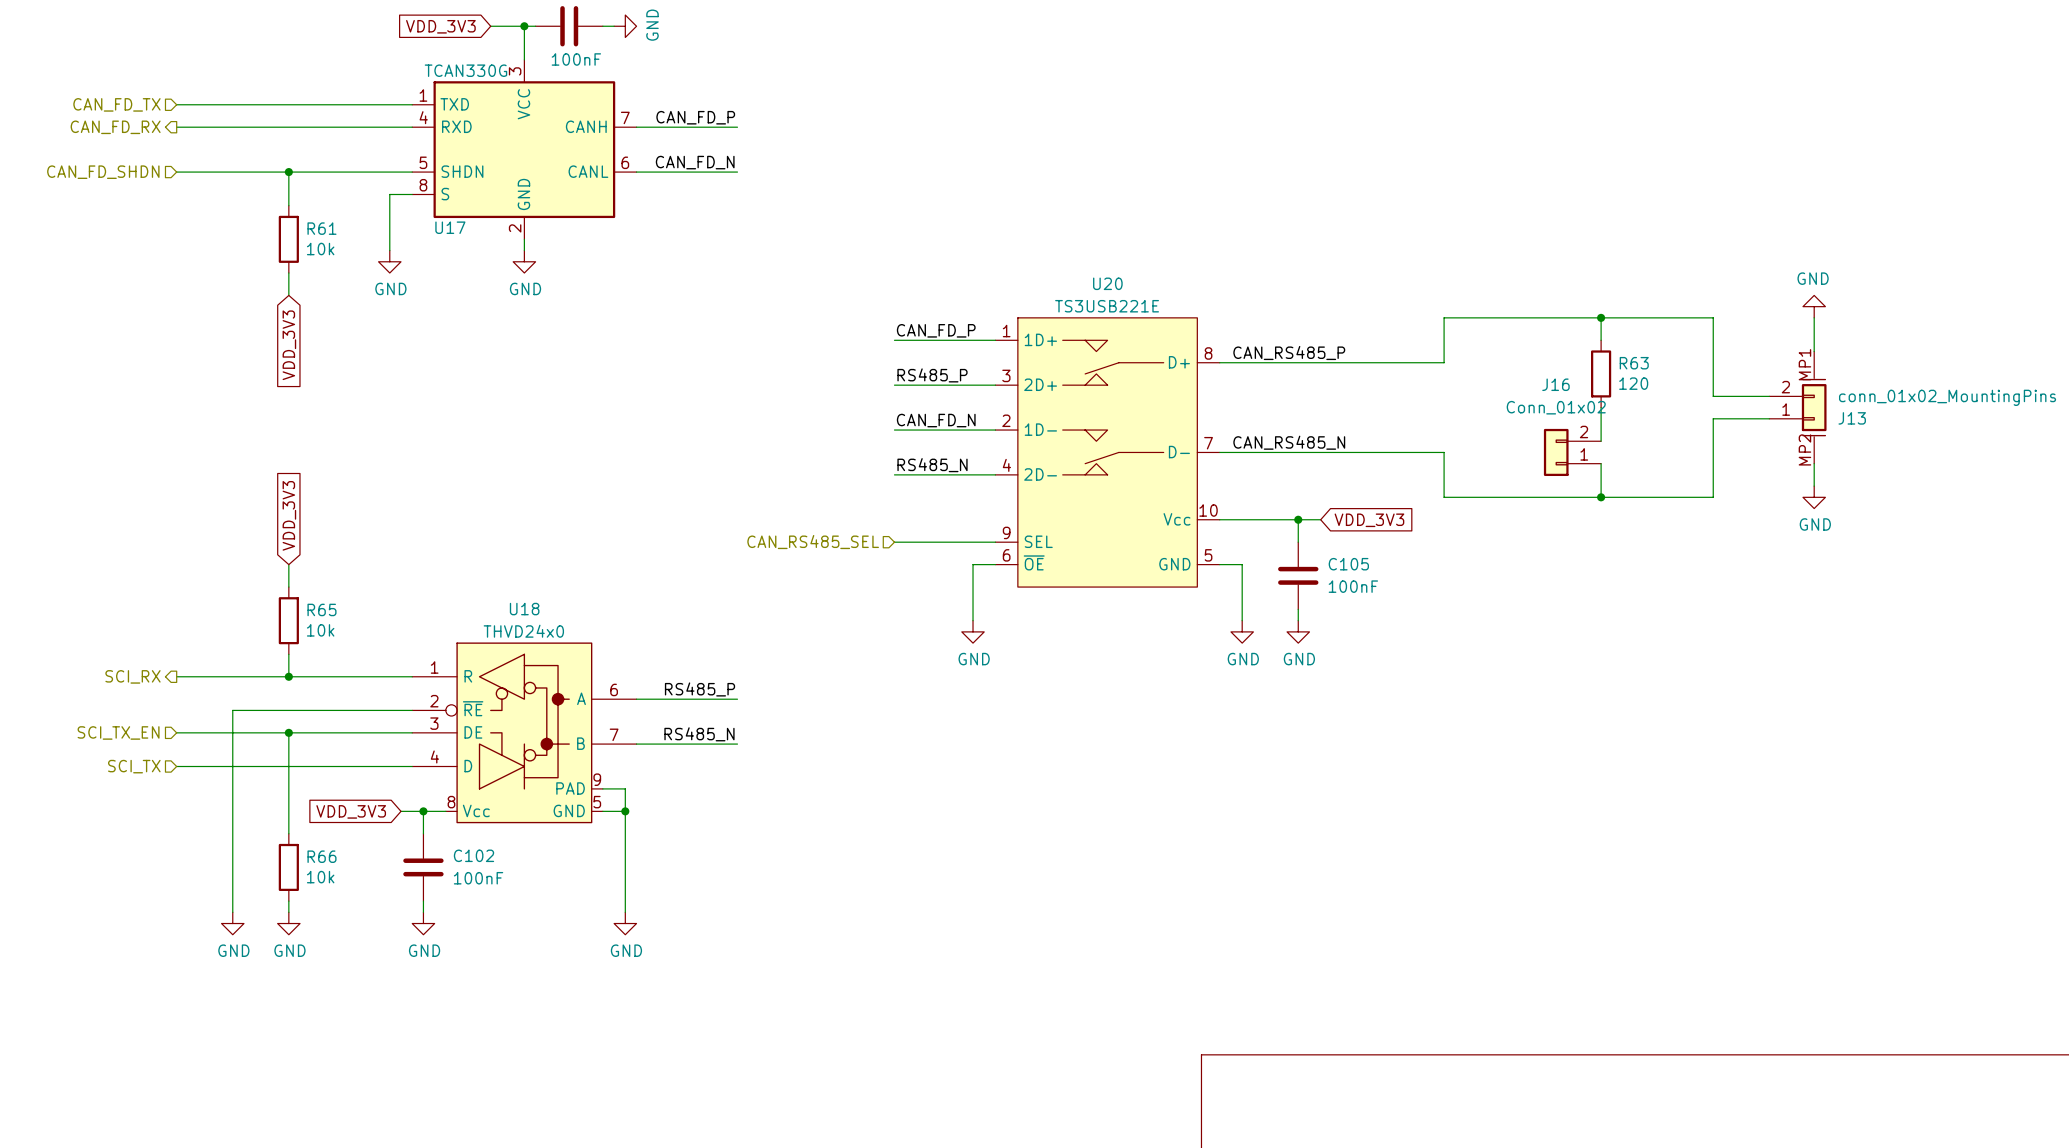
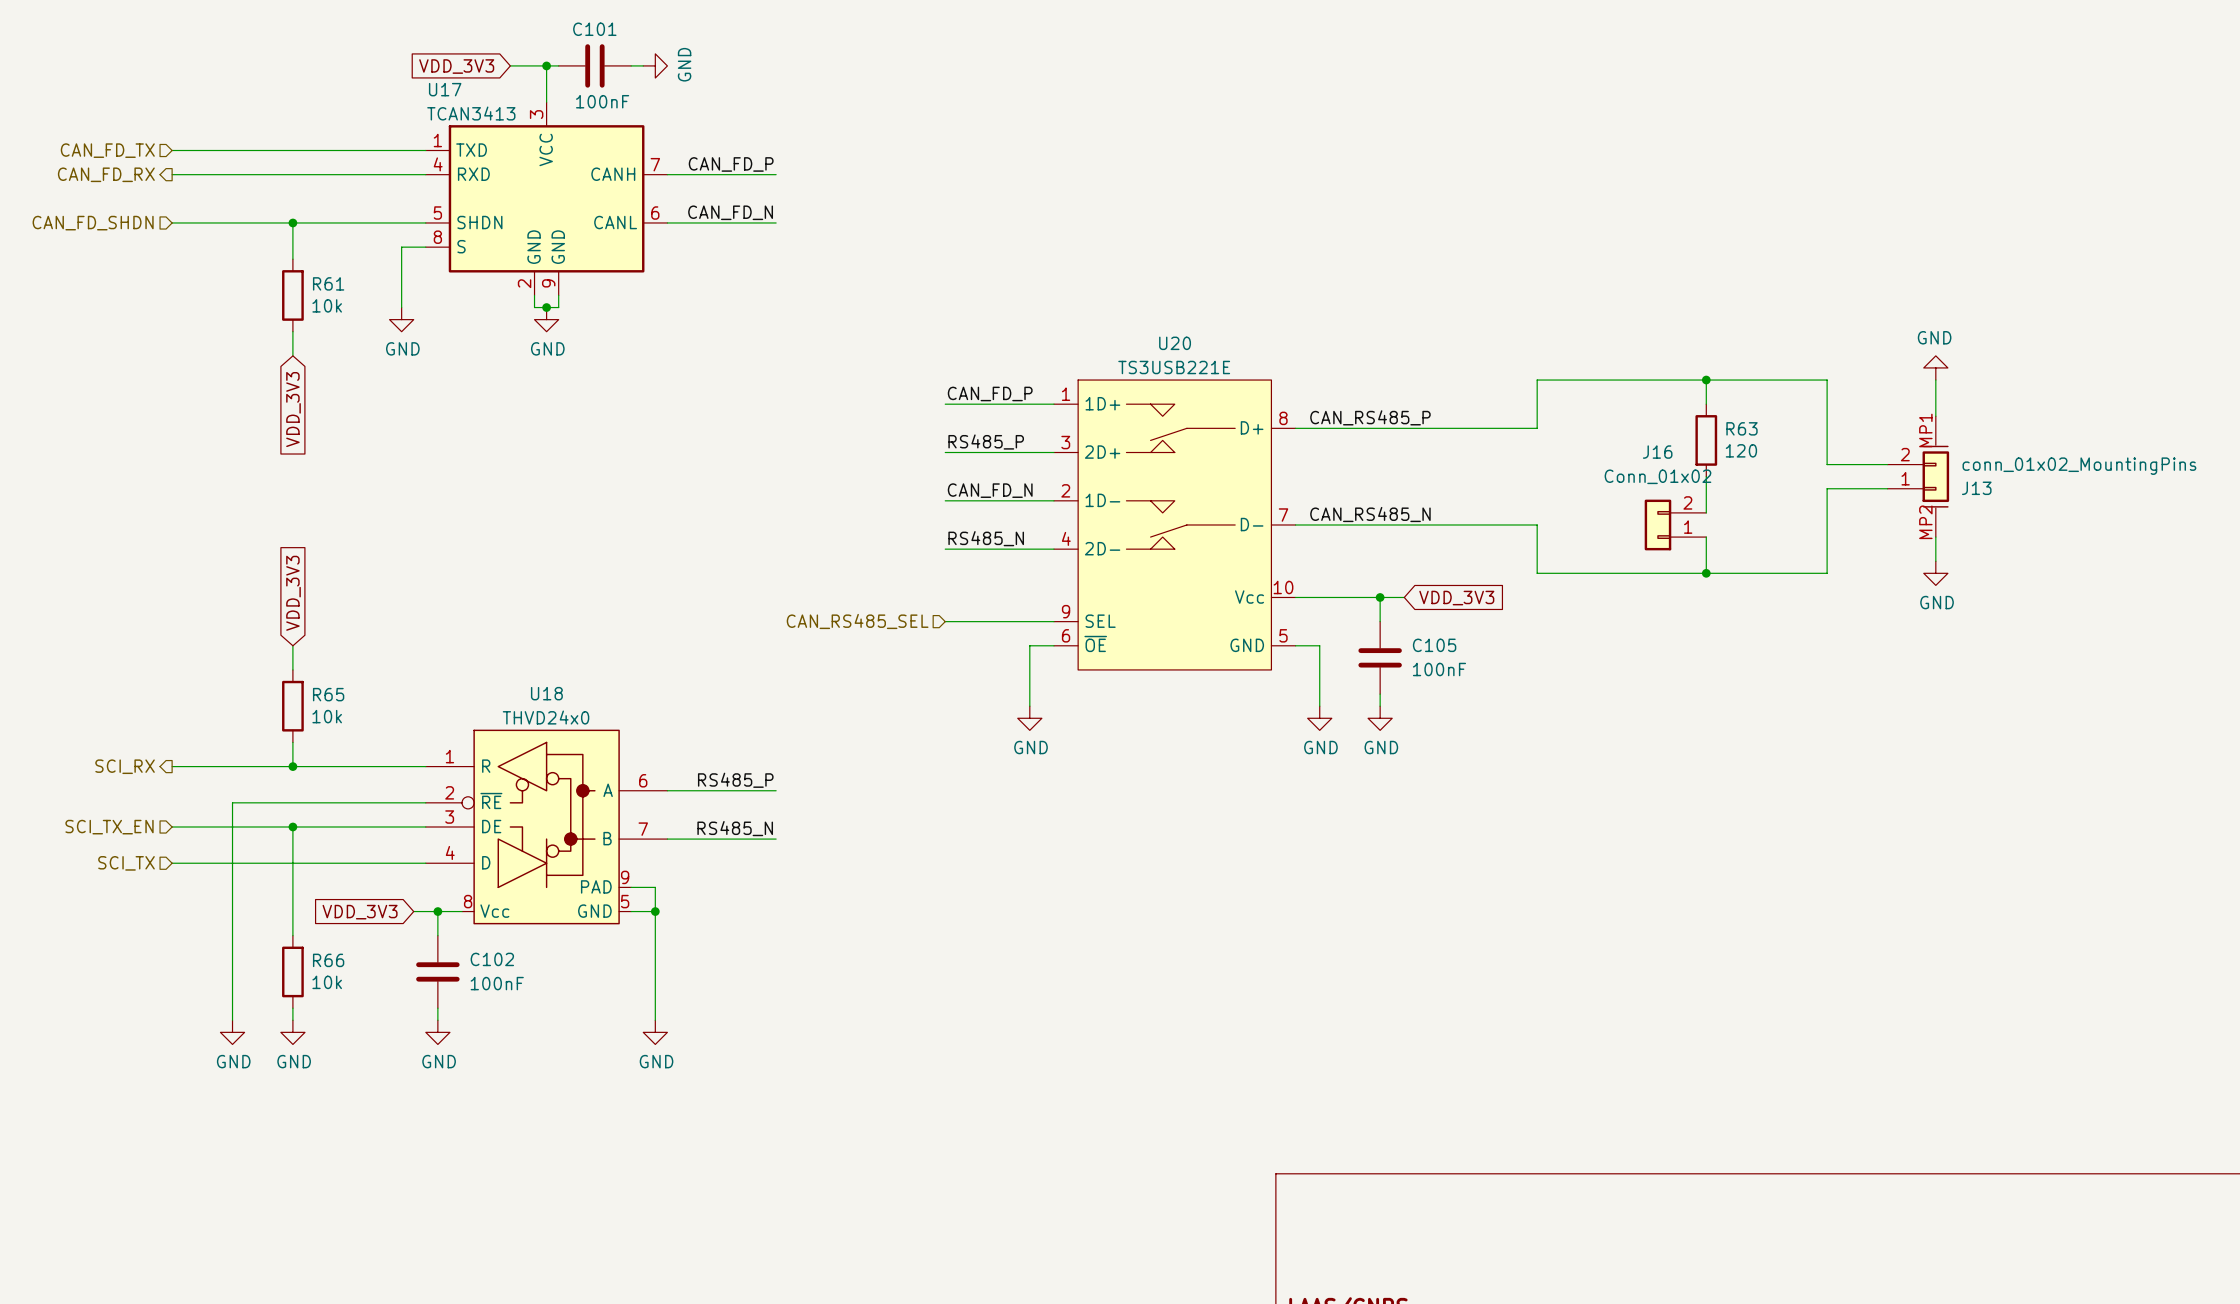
U17 symbol: [412, 59, 637, 240] -> [425, 102, 668, 296]
U17 value: TCAN330G (465, 70) -> TCAN3413 (471, 113)
U17 name position: U17 (450, 227) -> U17 (445, 89)
wire: none -> (534, 295) (534, 307) (558, 307) (558, 295)
wire: (524, 239) (524, 250) -> none
junction: none -> (546, 307)

